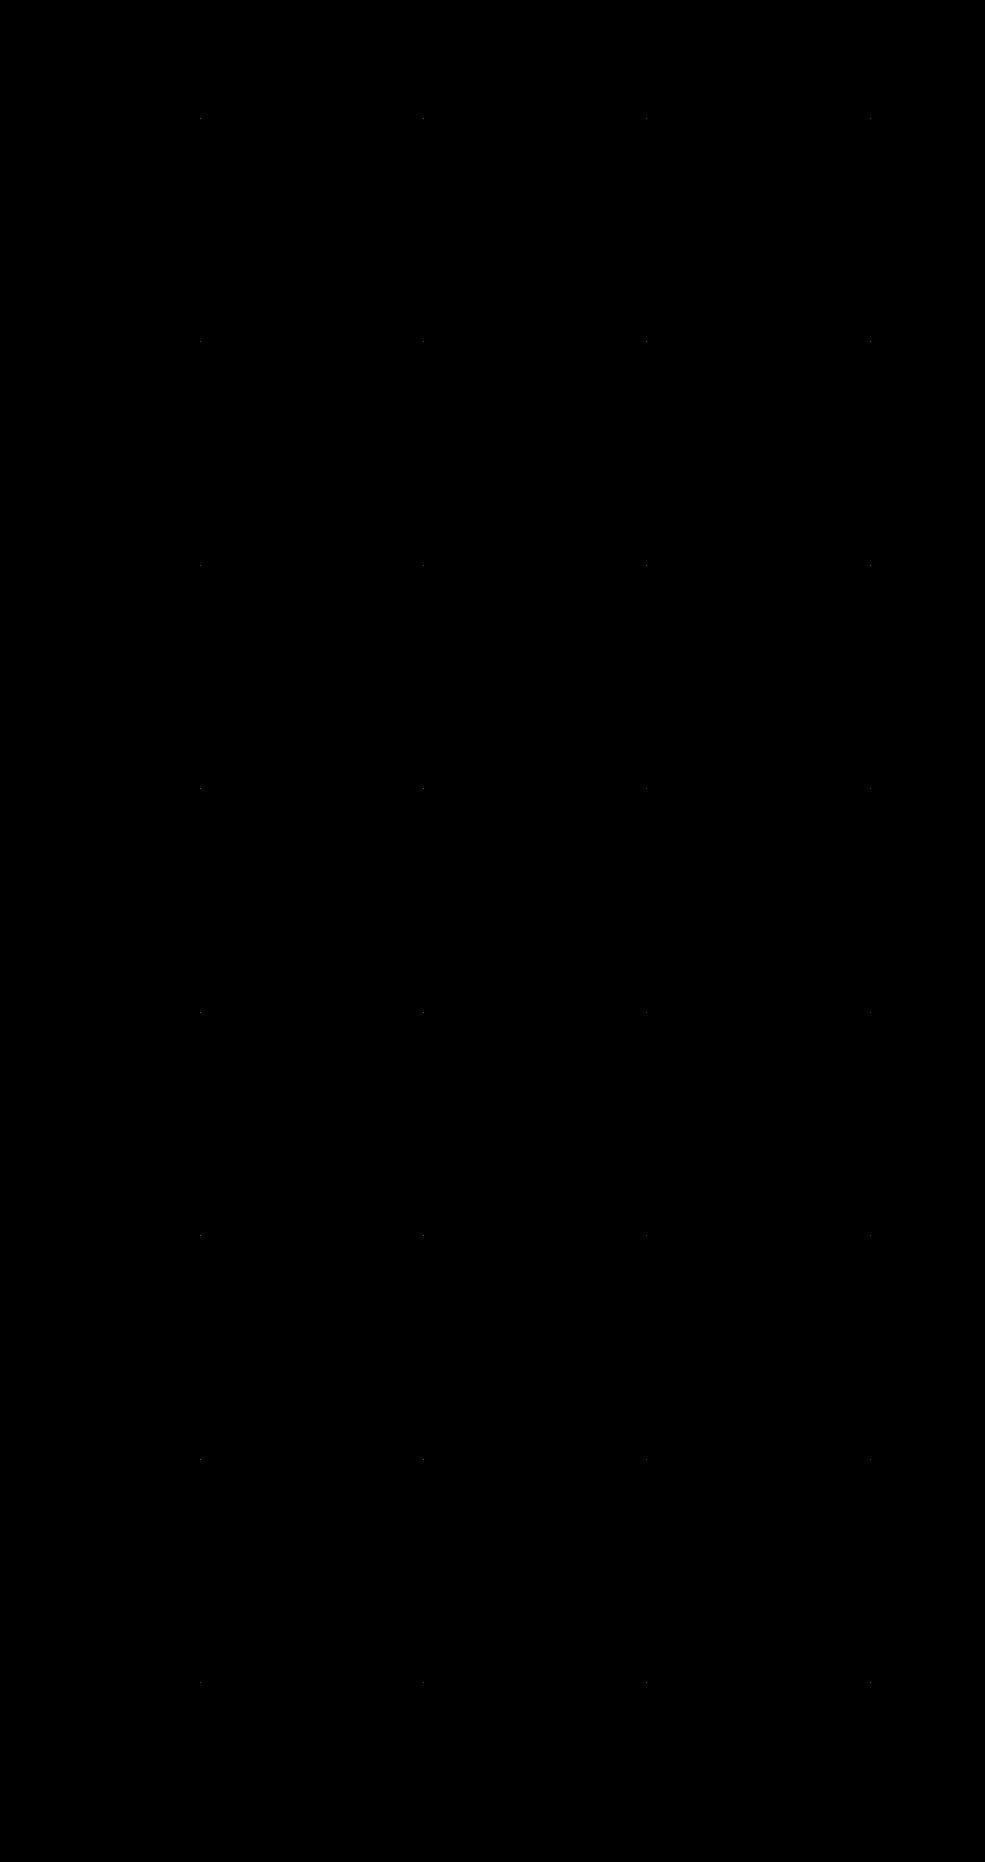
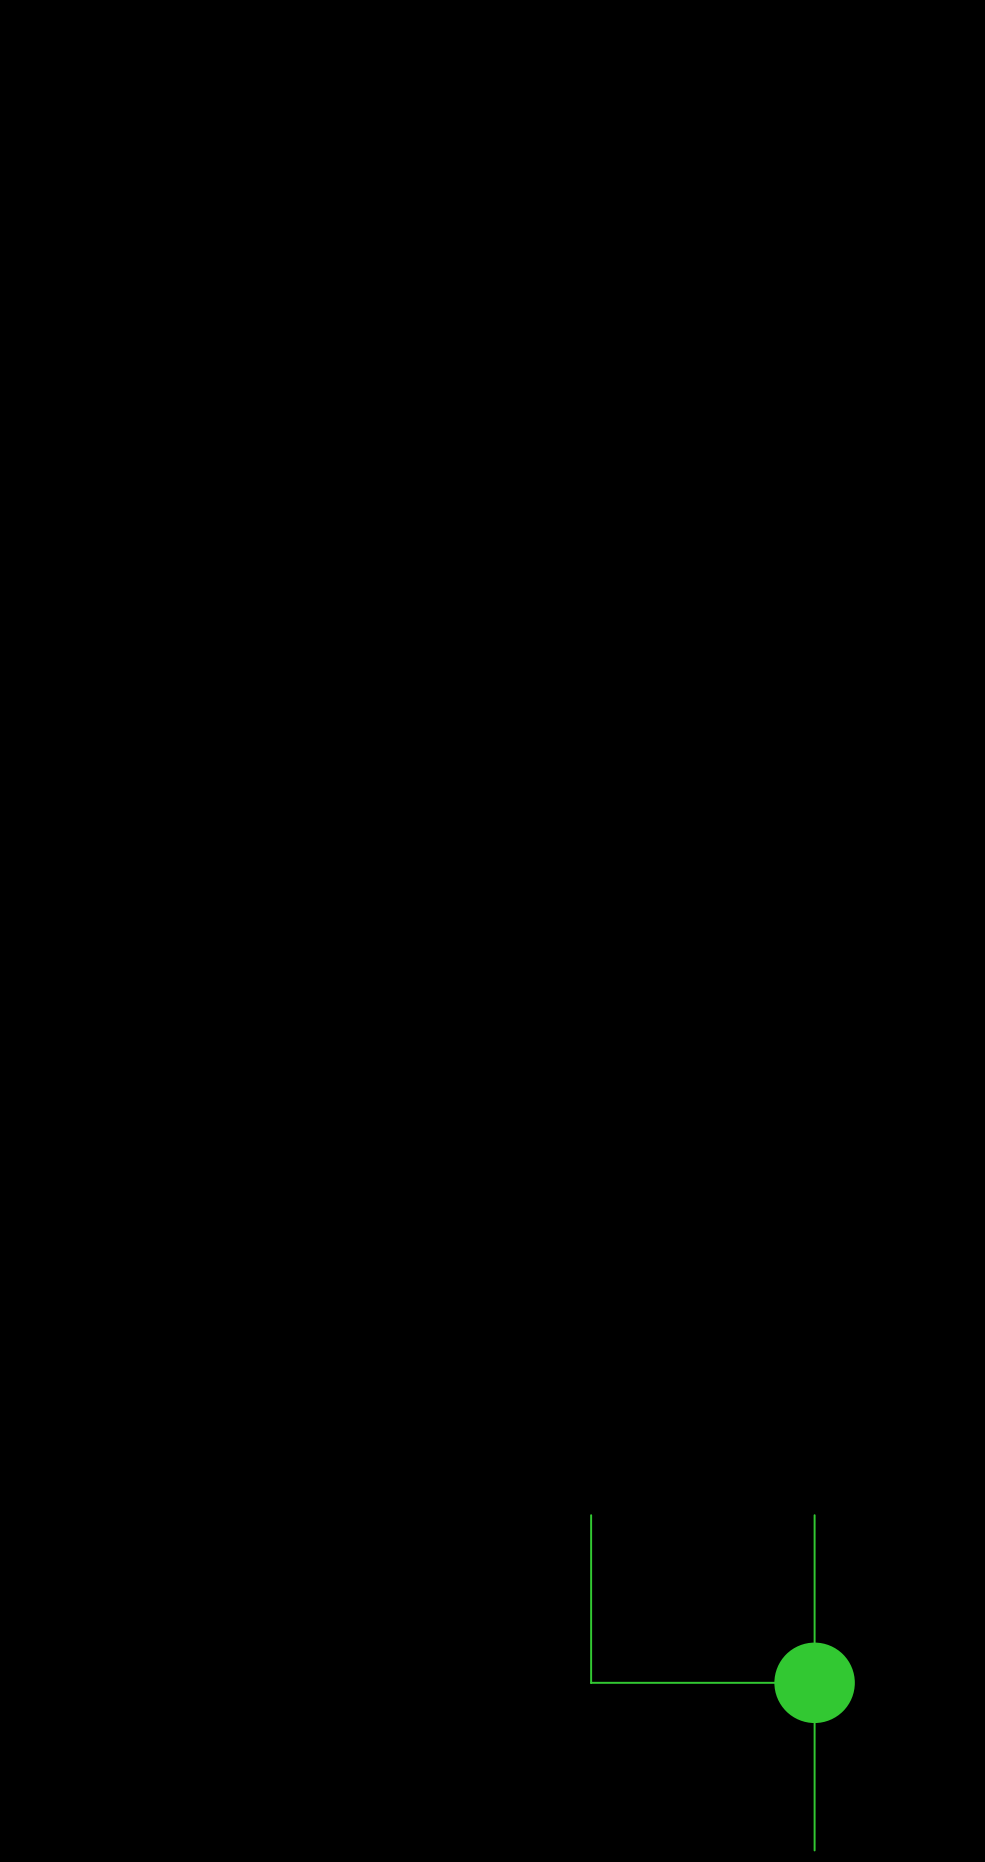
wire: none -> (591, 1515) (591, 1682) (814, 1682)
wire: none -> (814, 1515) (814, 1850)
junction: none -> (814, 1682)

